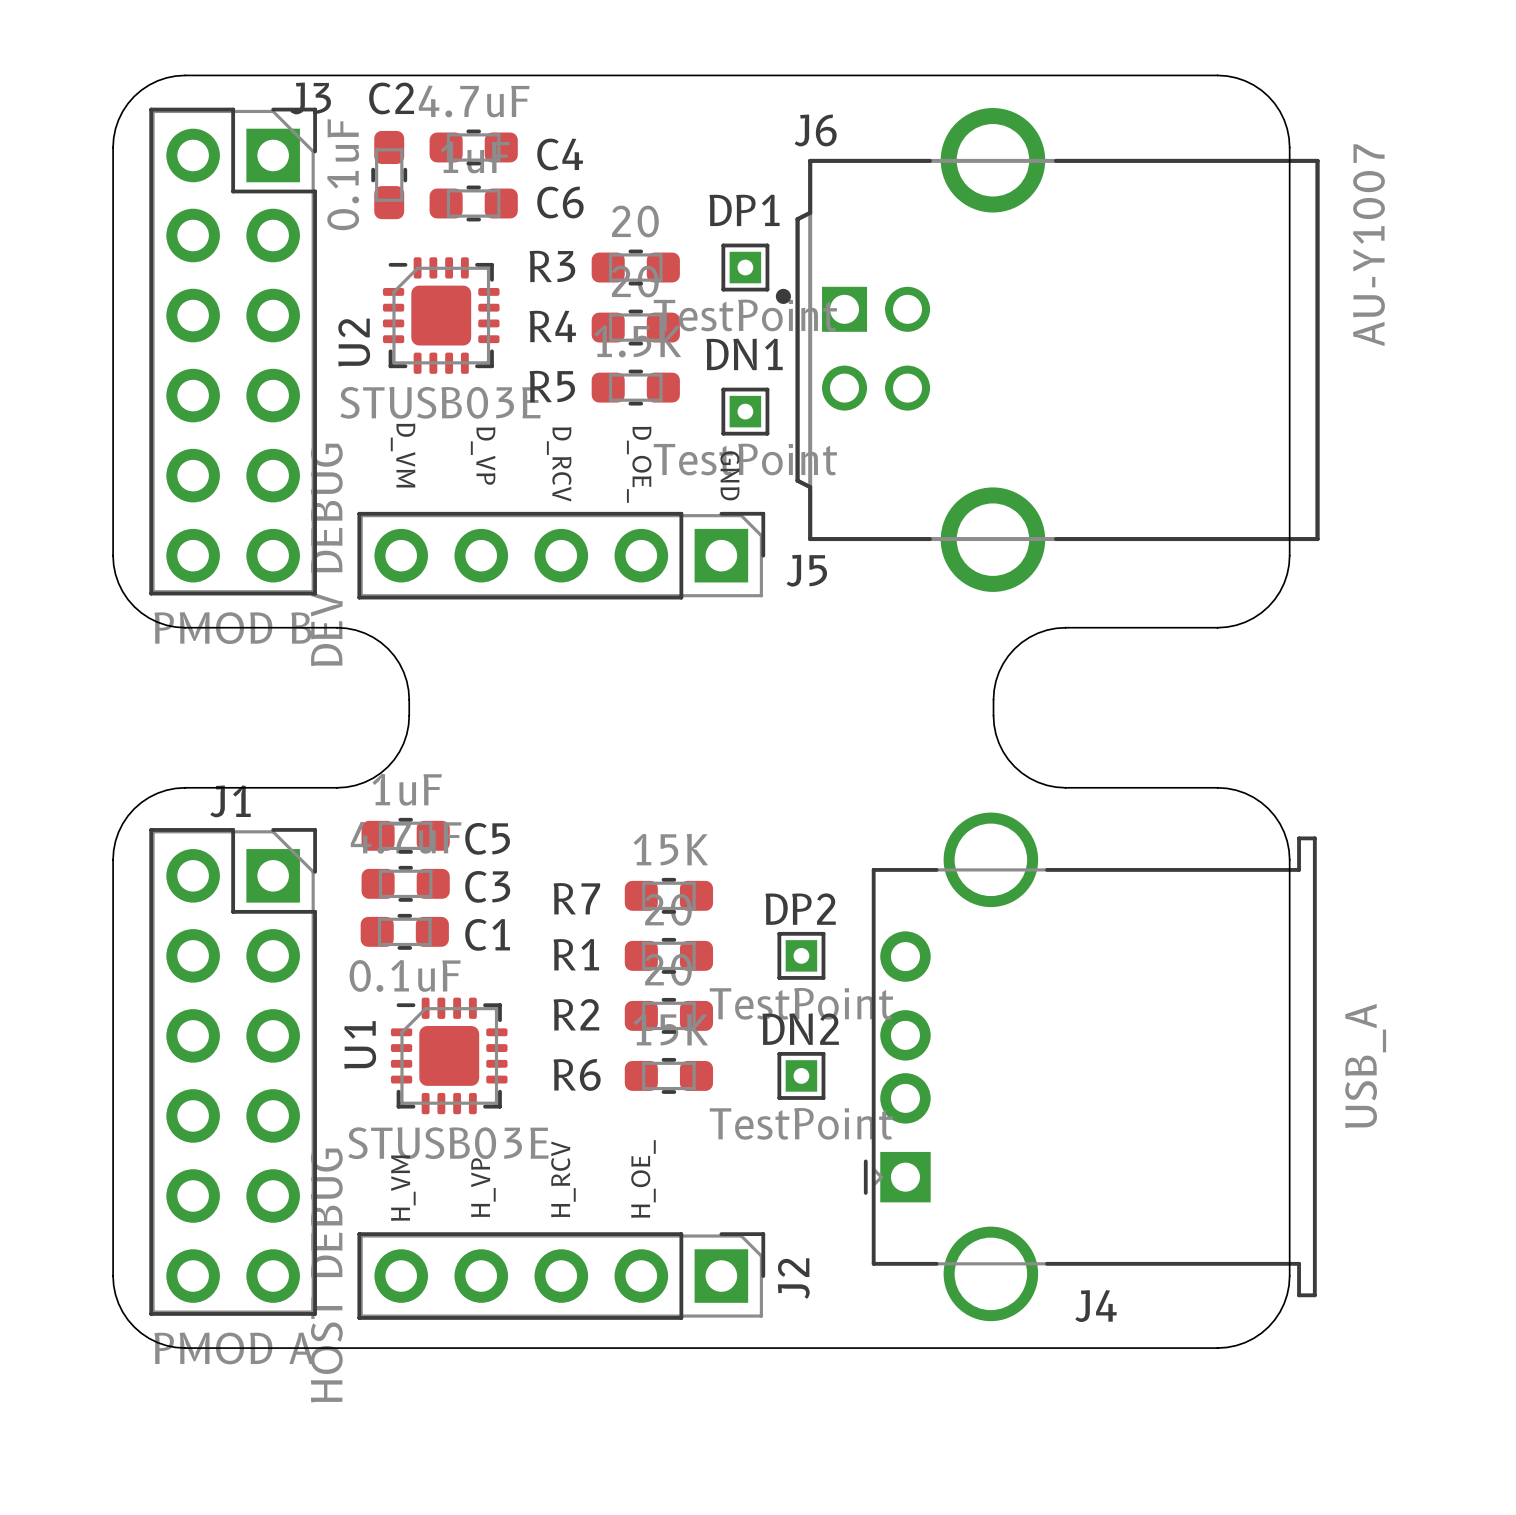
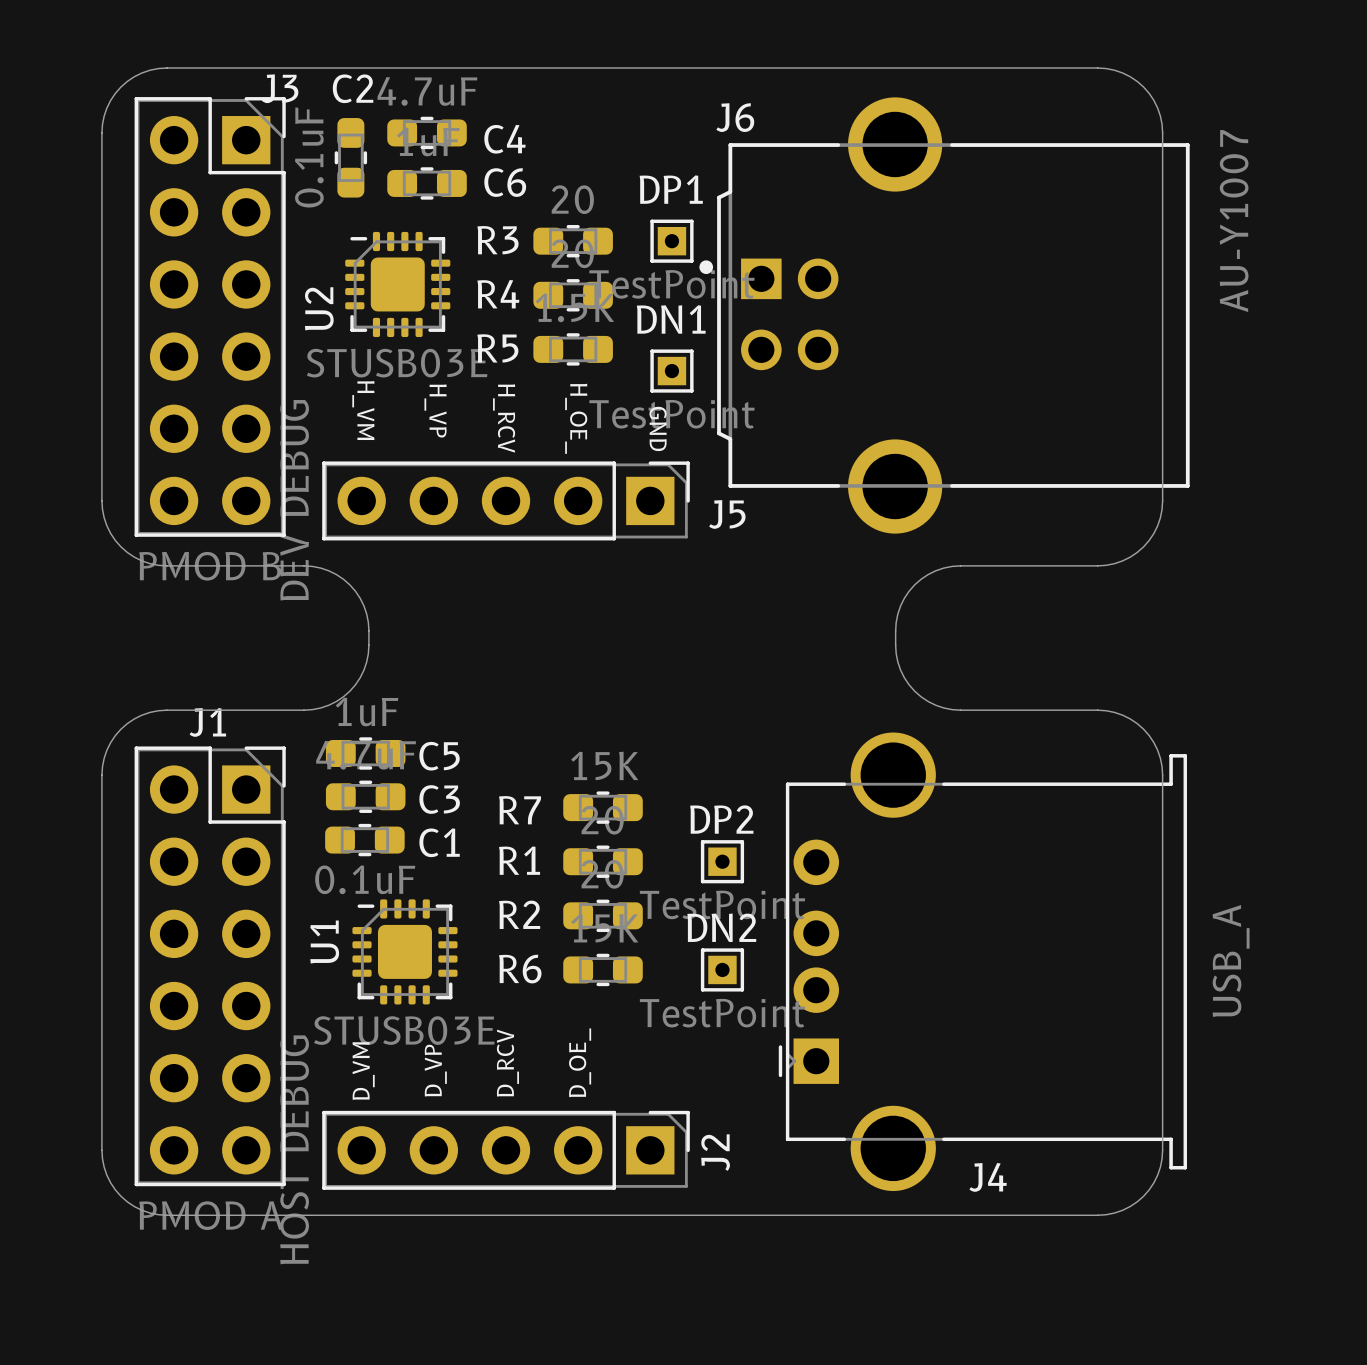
text: D_VM (403, 455) -> H_VM (363, 410)
text: D_VP (483, 456) -> H_VP (435, 410)
text: D_RCV (559, 464) -> H_RCV (504, 418)
text: D_OE_ (639, 464) -> H_OE_ (576, 418)
text: H_RCV (563, 1179) -> D_RCV (507, 1063)
text: H_OE_ (643, 1179) -> D_OE_ (580, 1062)
text: H_VP (483, 1187) -> D_VP (435, 1070)
text: H_VM (403, 1188) -> D_VM (363, 1071)

